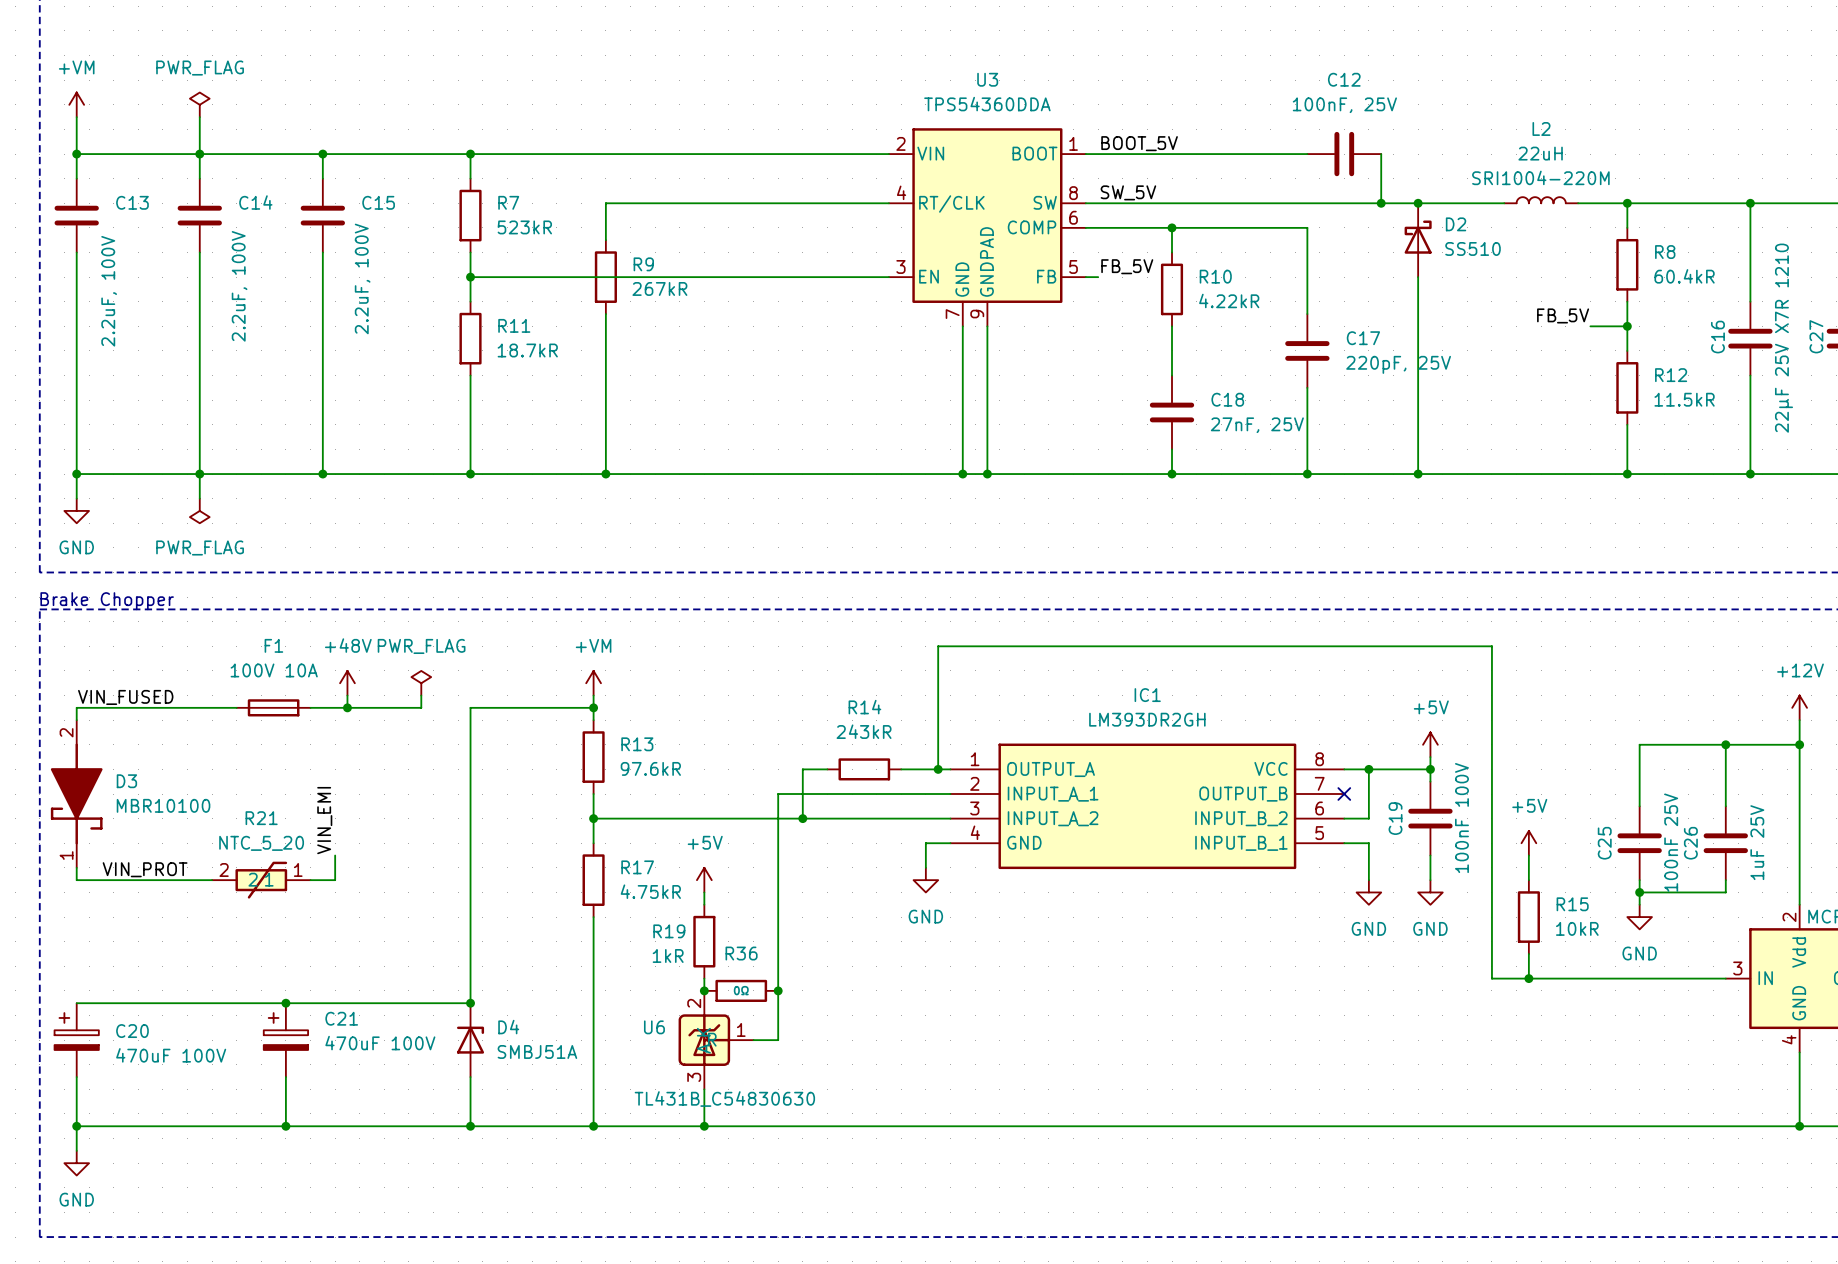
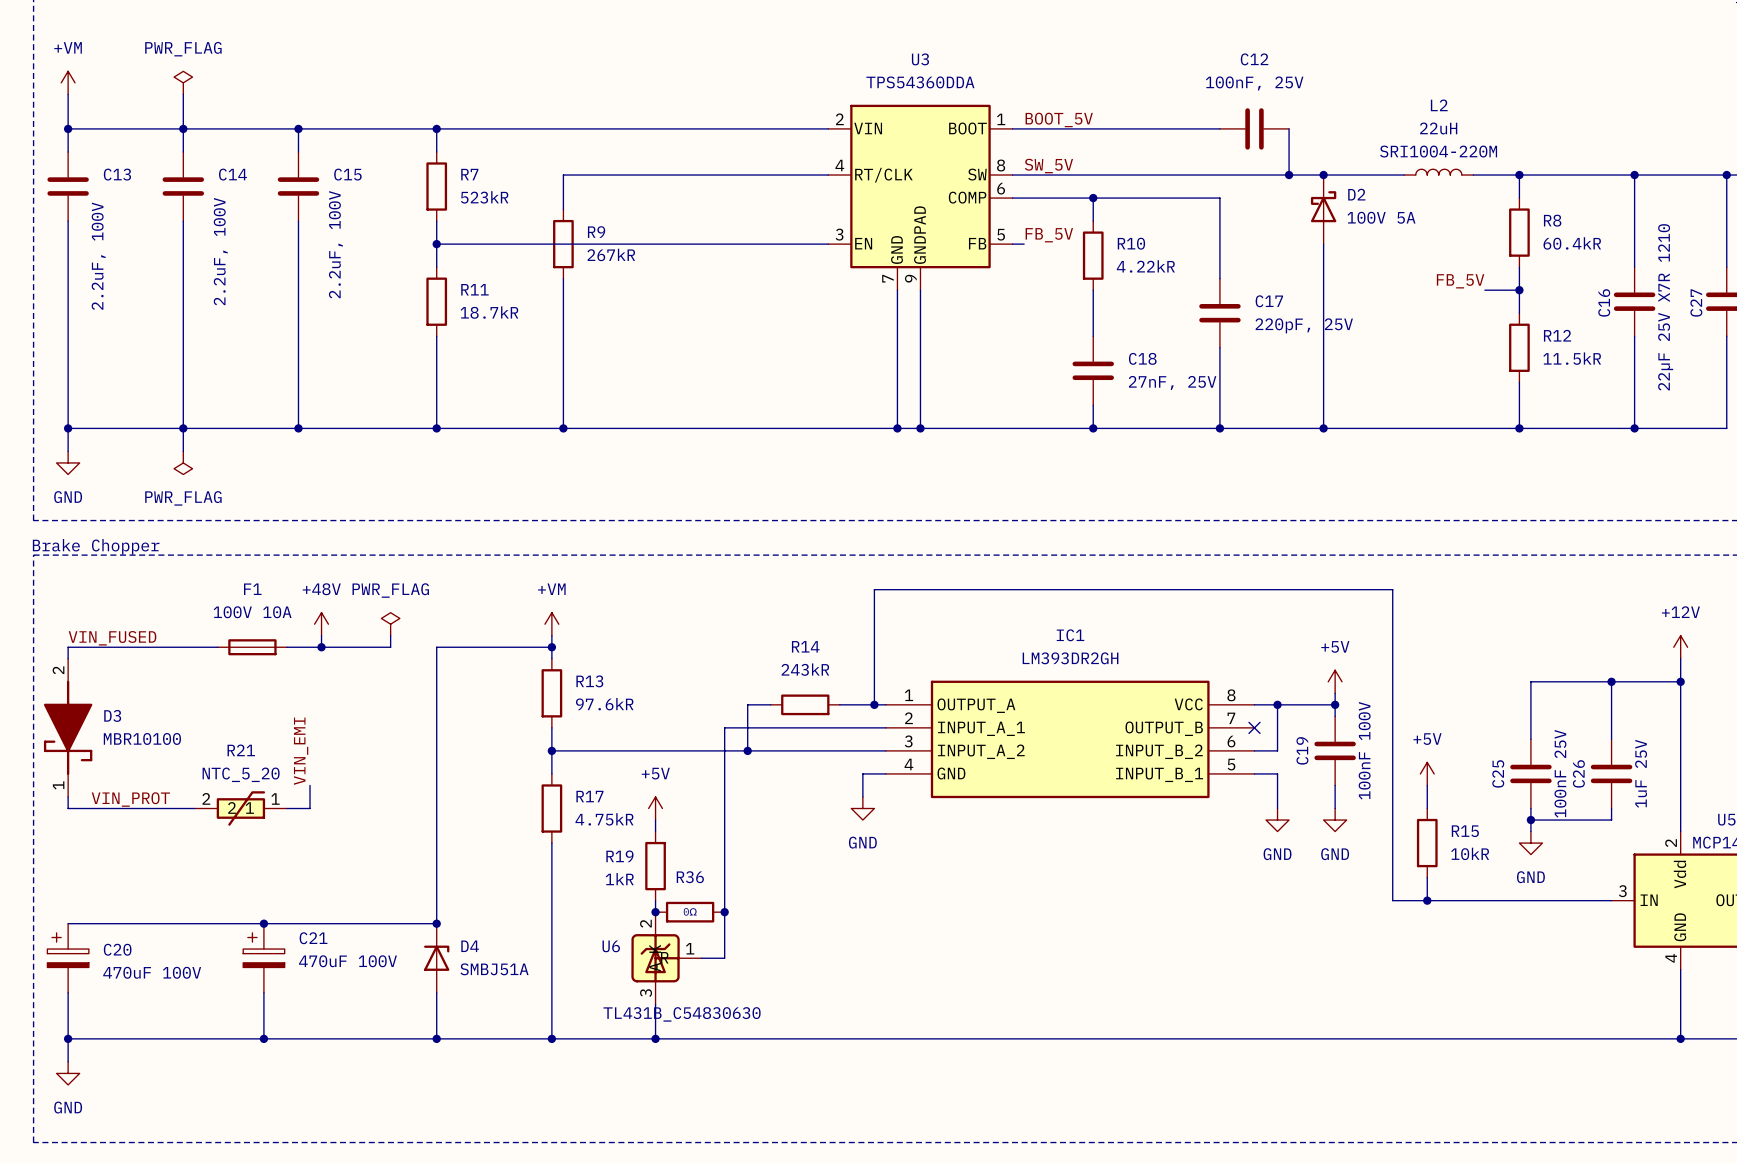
D2 value: SS510 (1473, 248) -> 100V 5A (1381, 217)

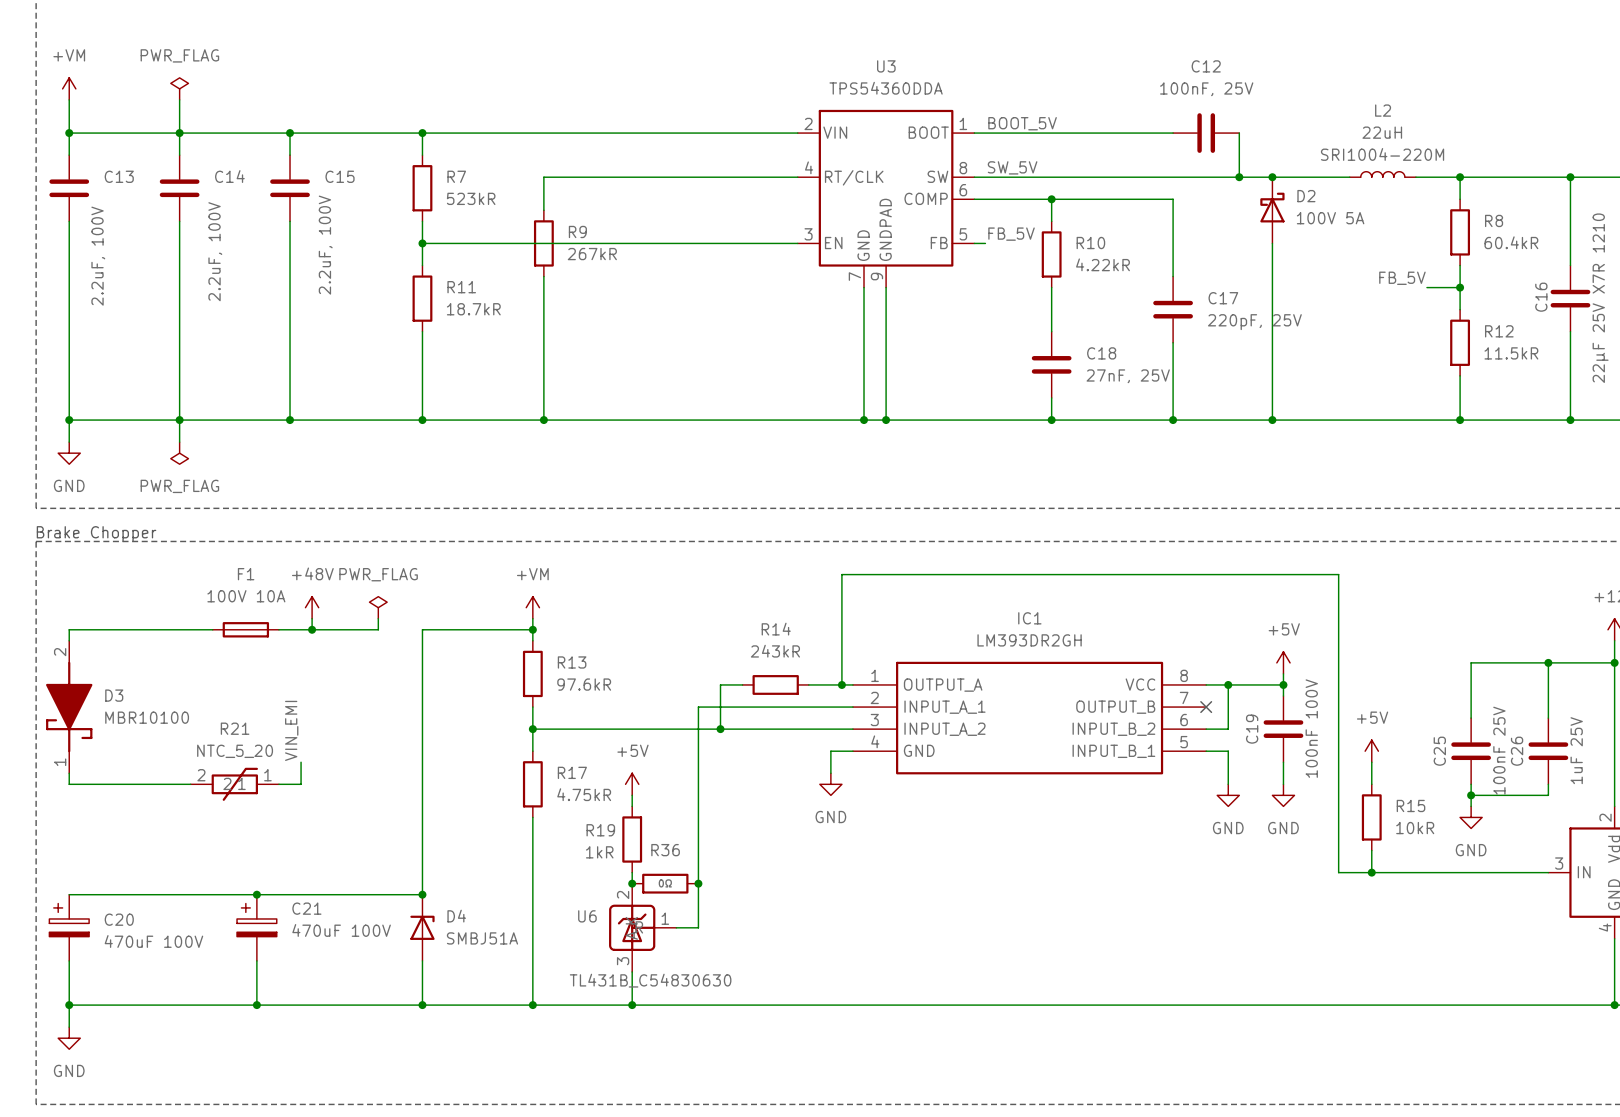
label: VIN_FUSED (112, 638) -> none
label: VIN_PROT (130, 799) -> none

